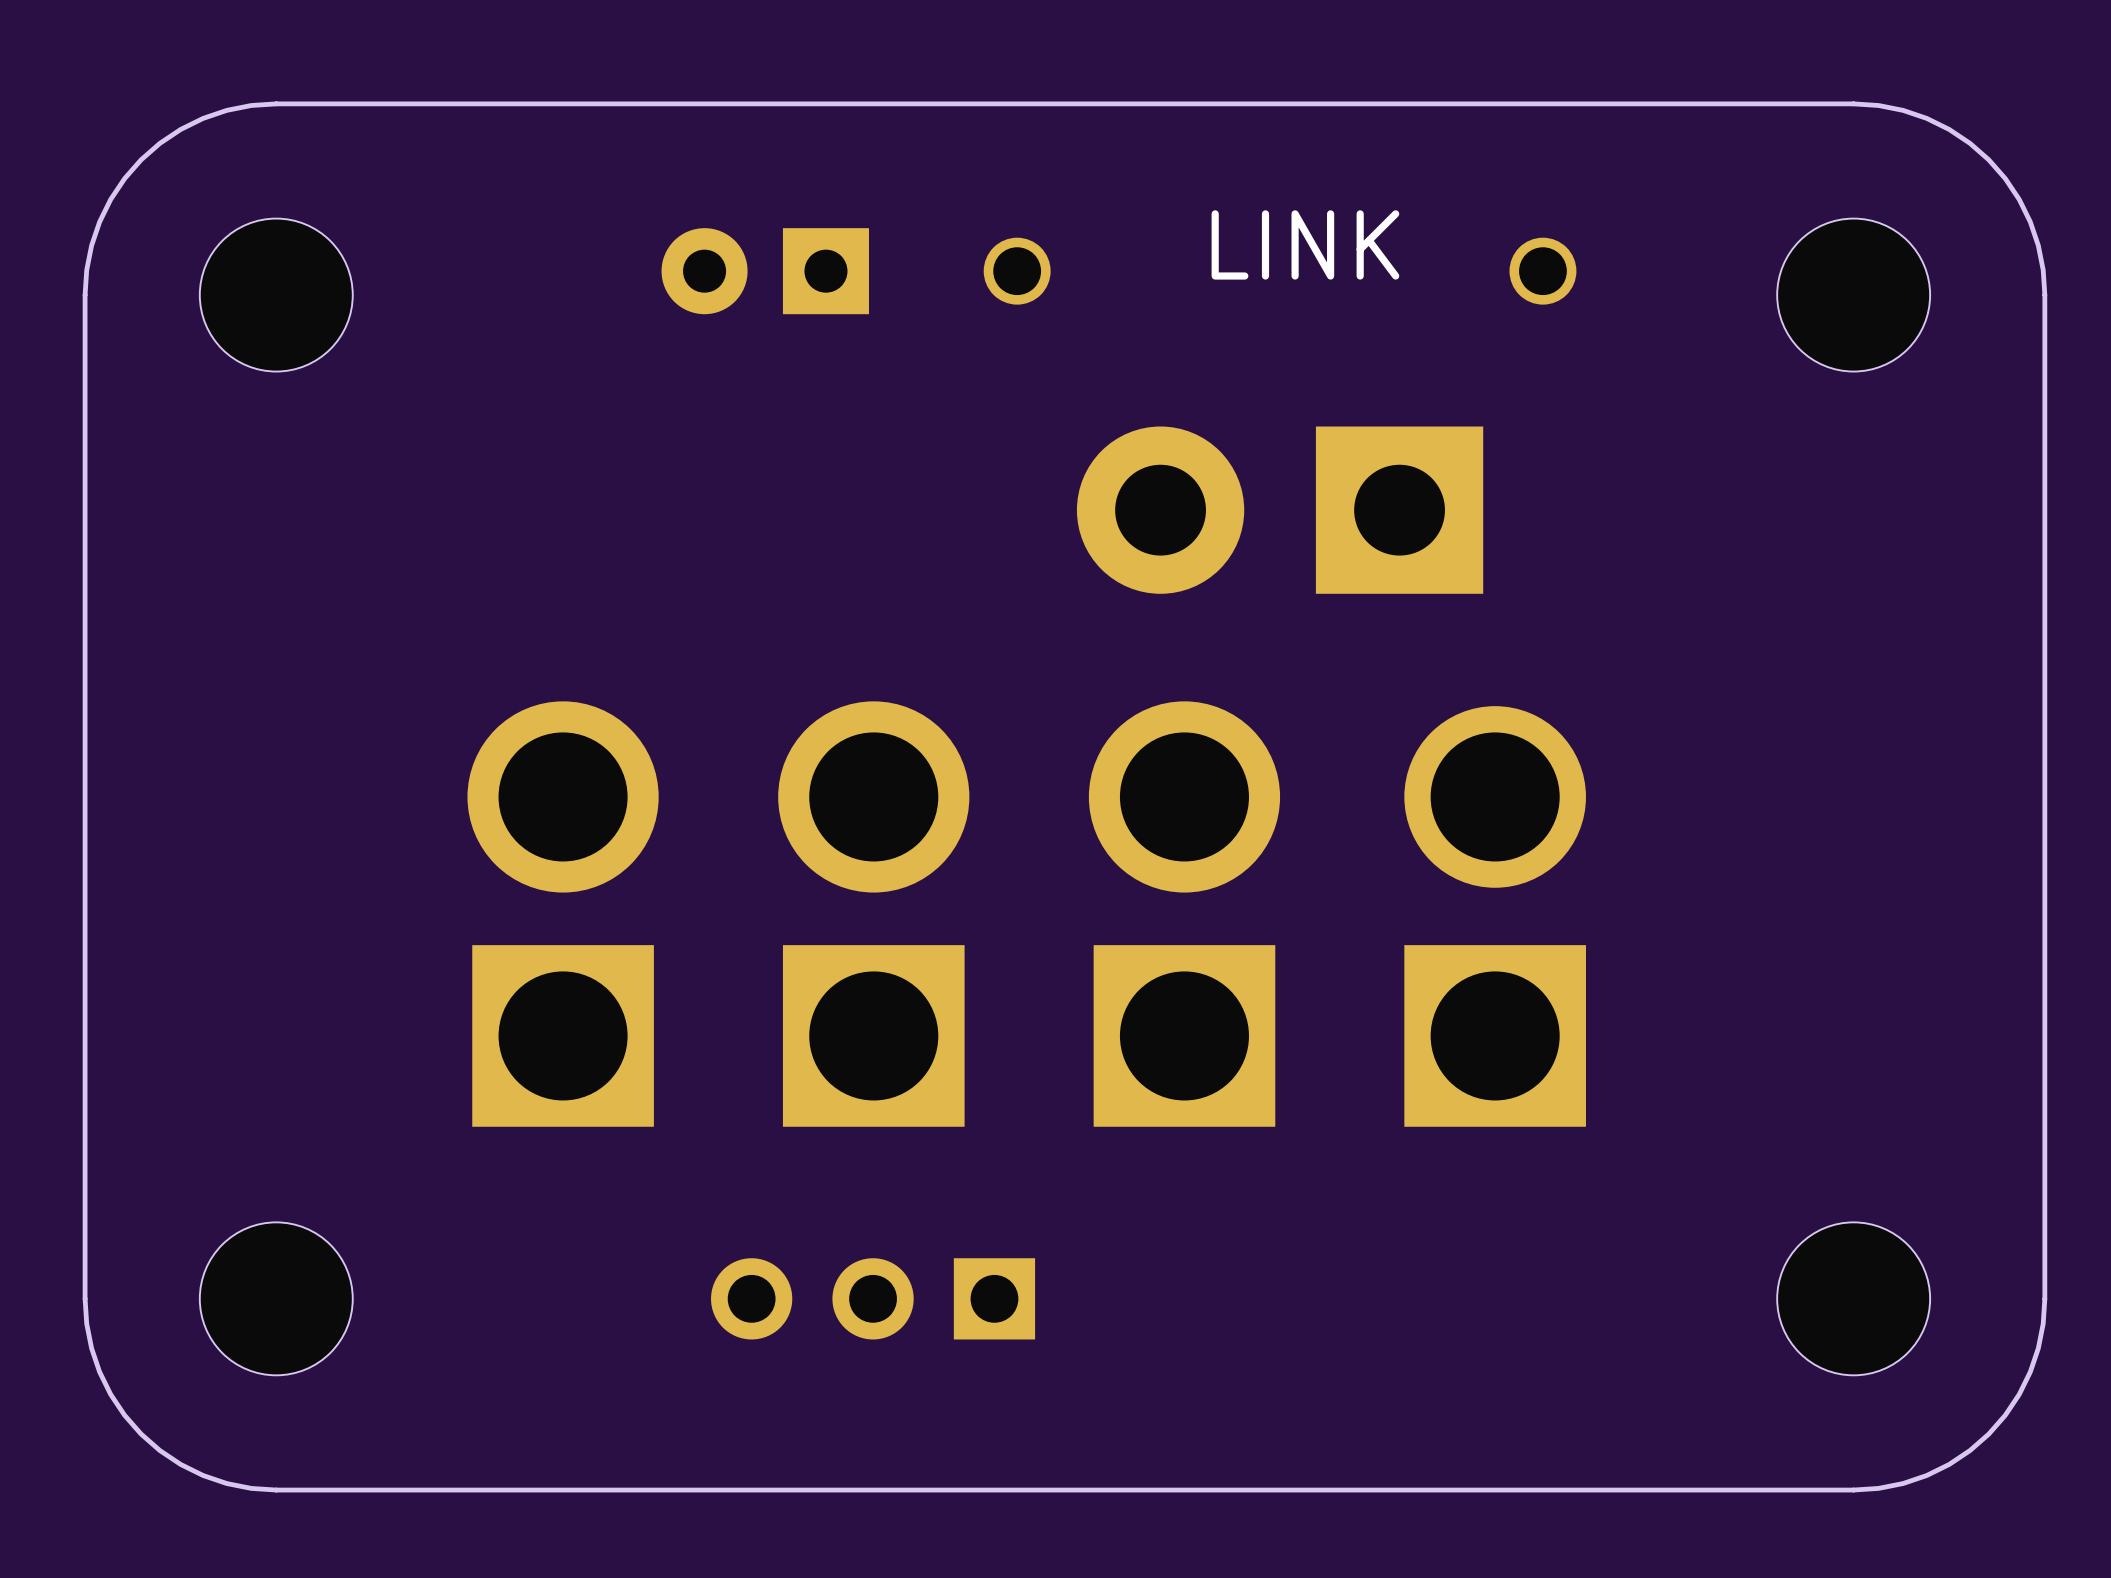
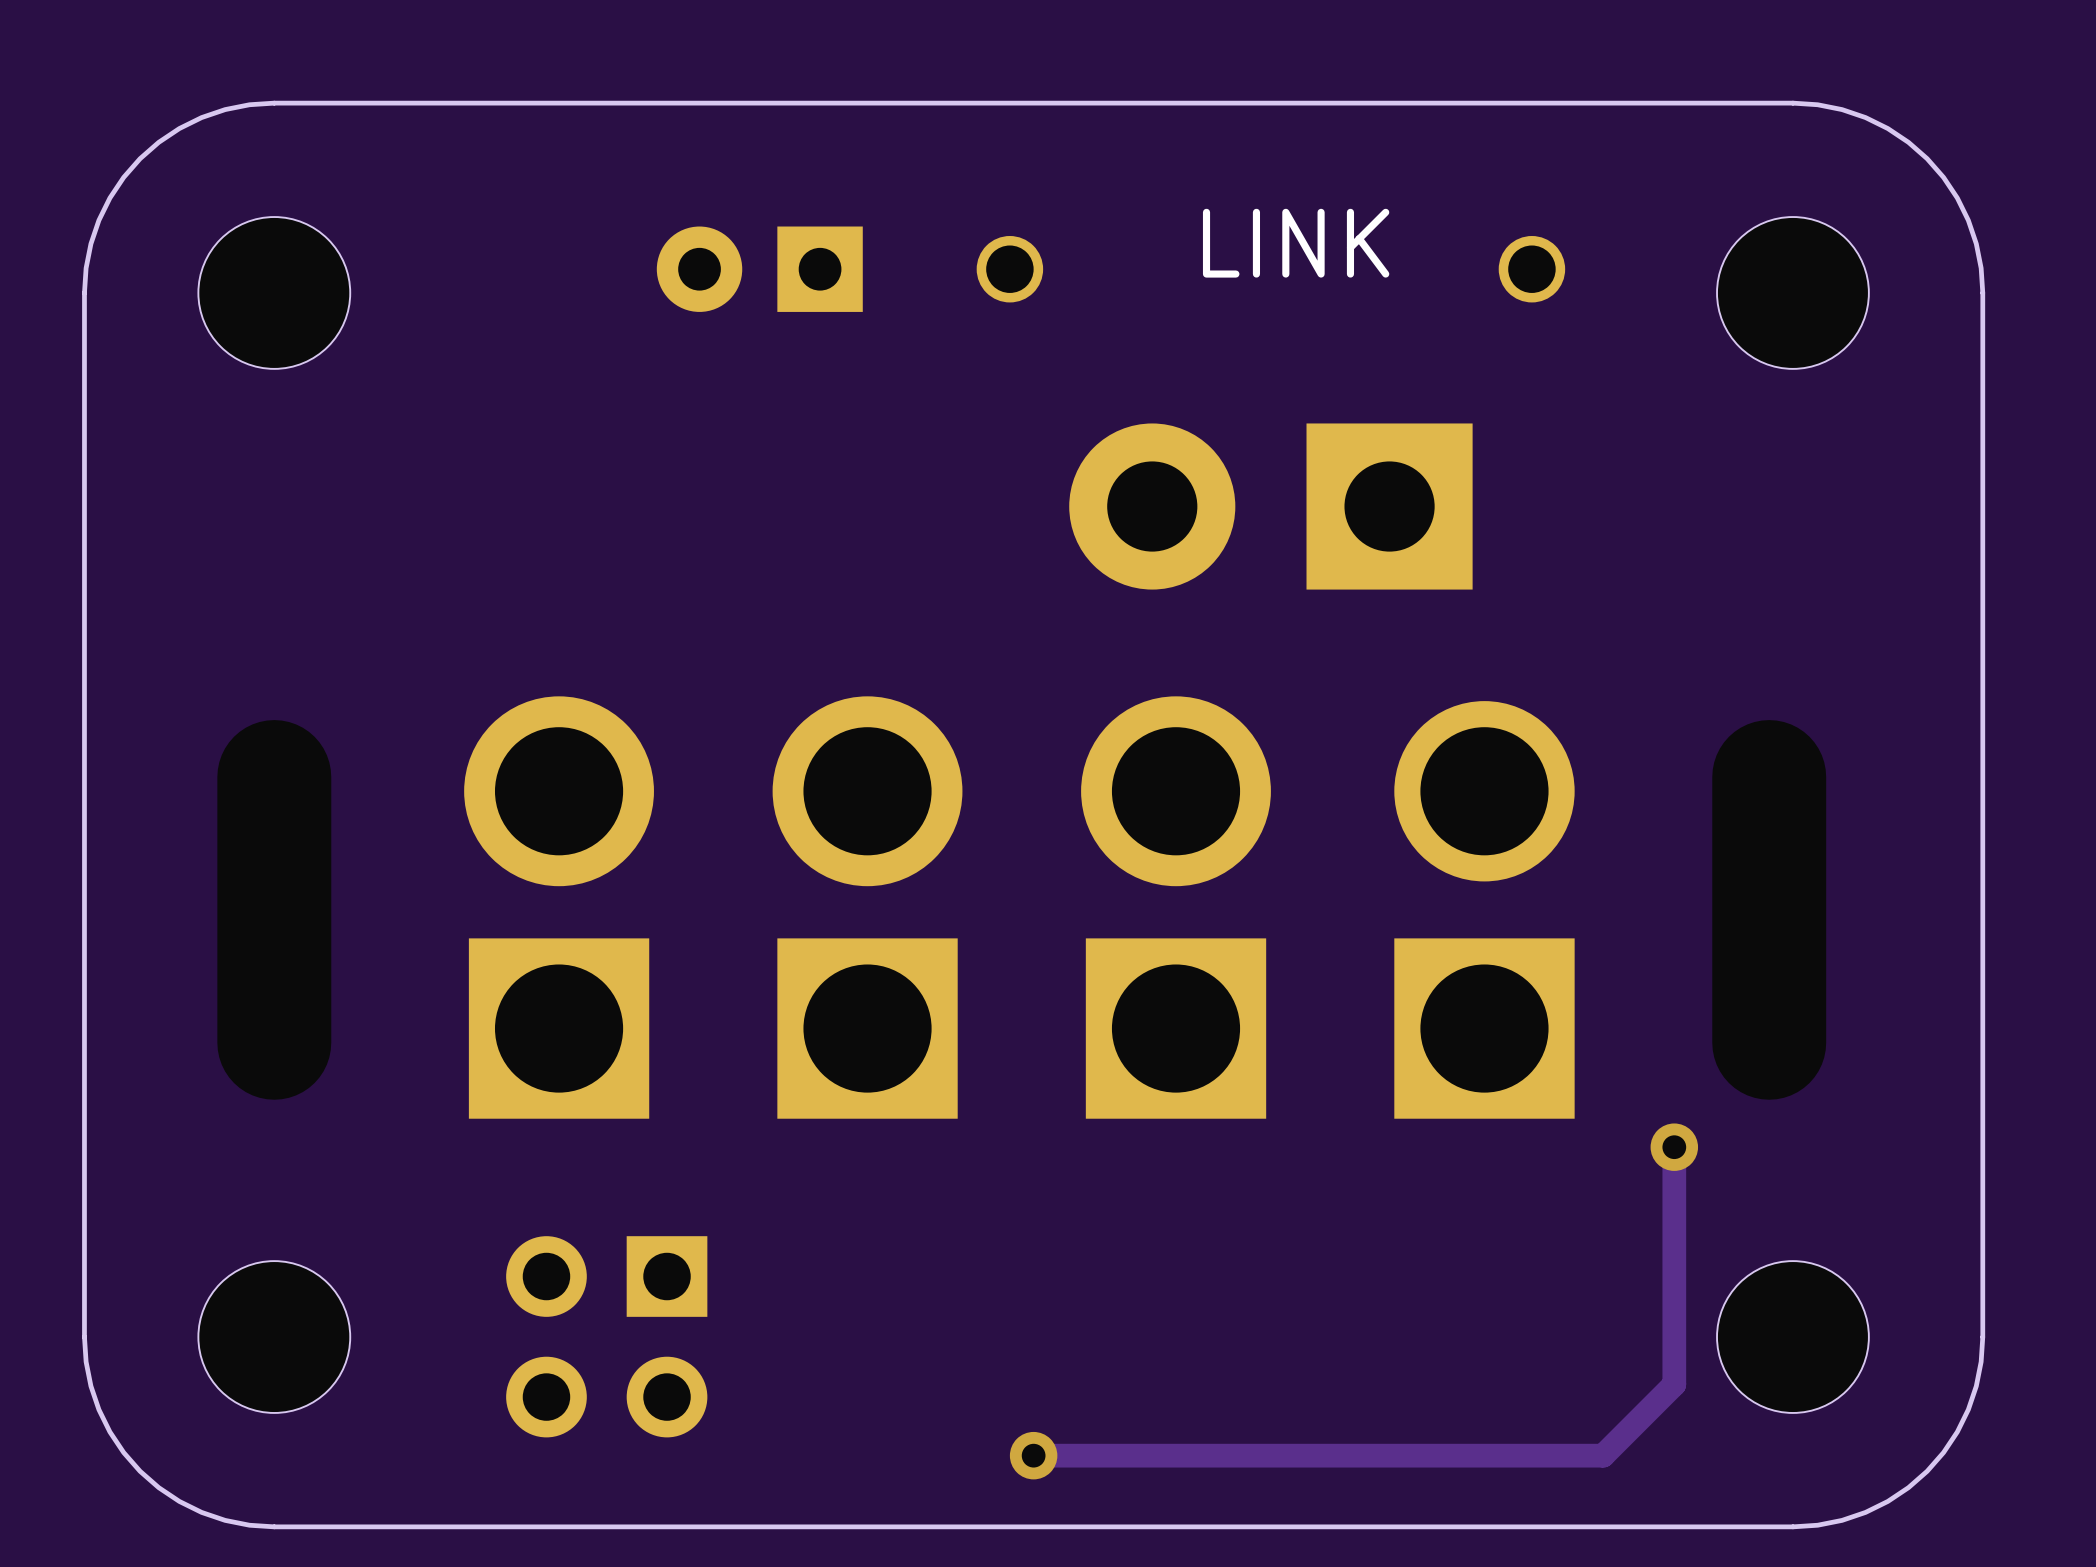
board edge: (1805, 103) (1878, 105) (1903, 110) (1926, 118) (1949, 129) (1970, 143) (1988, 159) (2005, 178) (2019, 199) (2030, 221) (2038, 245) (2043, 270) (2044, 295) (2044, 1298) (2043, 1323) (2038, 1348) (2030, 1372) (2019, 1394) (2005, 1415) (1988, 1434) (1970, 1450) (1949, 1464) (1926, 1475) (1903, 1483) (1878, 1488) (1853, 1490) (276, 1490) (251, 1488) (226, 1483) (203, 1475) (180, 1464) (159, 1450) (141, 1434) (124, 1415) (110, 1394) (99, 1372) (91, 1348) (86, 1323) (85, 1298) -> (1792, 103) (1817, 104) (1842, 109) (1865, 117) (1887, 128) (1908, 142) (1927, 158) (1943, 177) (1957, 198) (1968, 220) (1976, 243) (1981, 268) (1982, 292) (1982, 1337) (1981, 1361) (1976, 1386) (1968, 1409) (1957, 1431) (1943, 1452) (1927, 1471) (1908, 1487) (1887, 1501) (1865, 1512) (1842, 1520) (1817, 1525) (1792, 1526) (274, 1526) (249, 1525) (225, 1520) (201, 1512) (179, 1501) (158, 1487) (140, 1471) (123, 1452) (109, 1431) (98, 1409) (90, 1386) (86, 1361) (84, 1289)
part position: (1853, 295) -> (1792, 292)
part: none -> (274, 909)
part: none -> (1769, 909)
track: none -> (1674, 1147) (1674, 1384) (1603, 1455) (1033, 1455)
via: none -> (1674, 1147)
part position: (276, 1298) -> (274, 1337)
part: (873, 1298) -> none
part position: (1853, 1298) -> (1792, 1337)
part: none -> (606, 1336)
via: none -> (1033, 1455)

